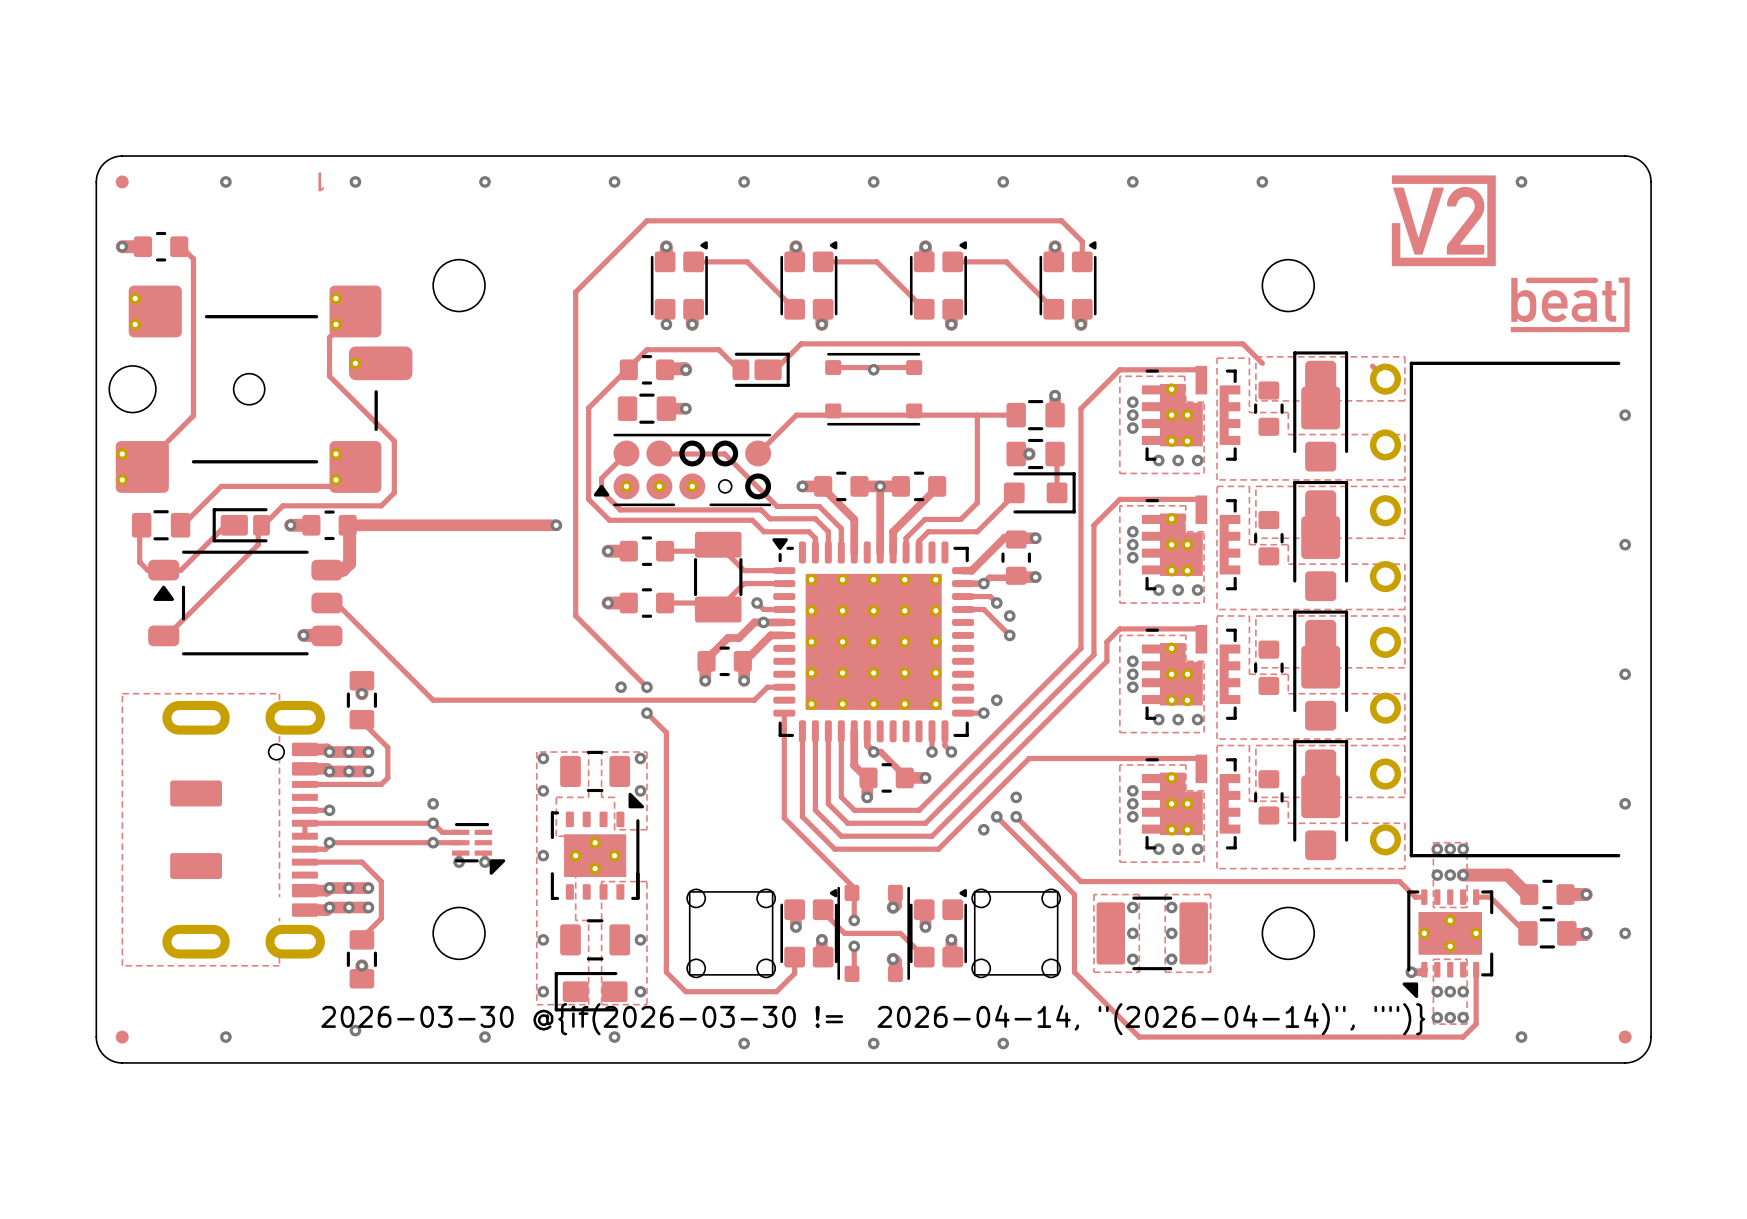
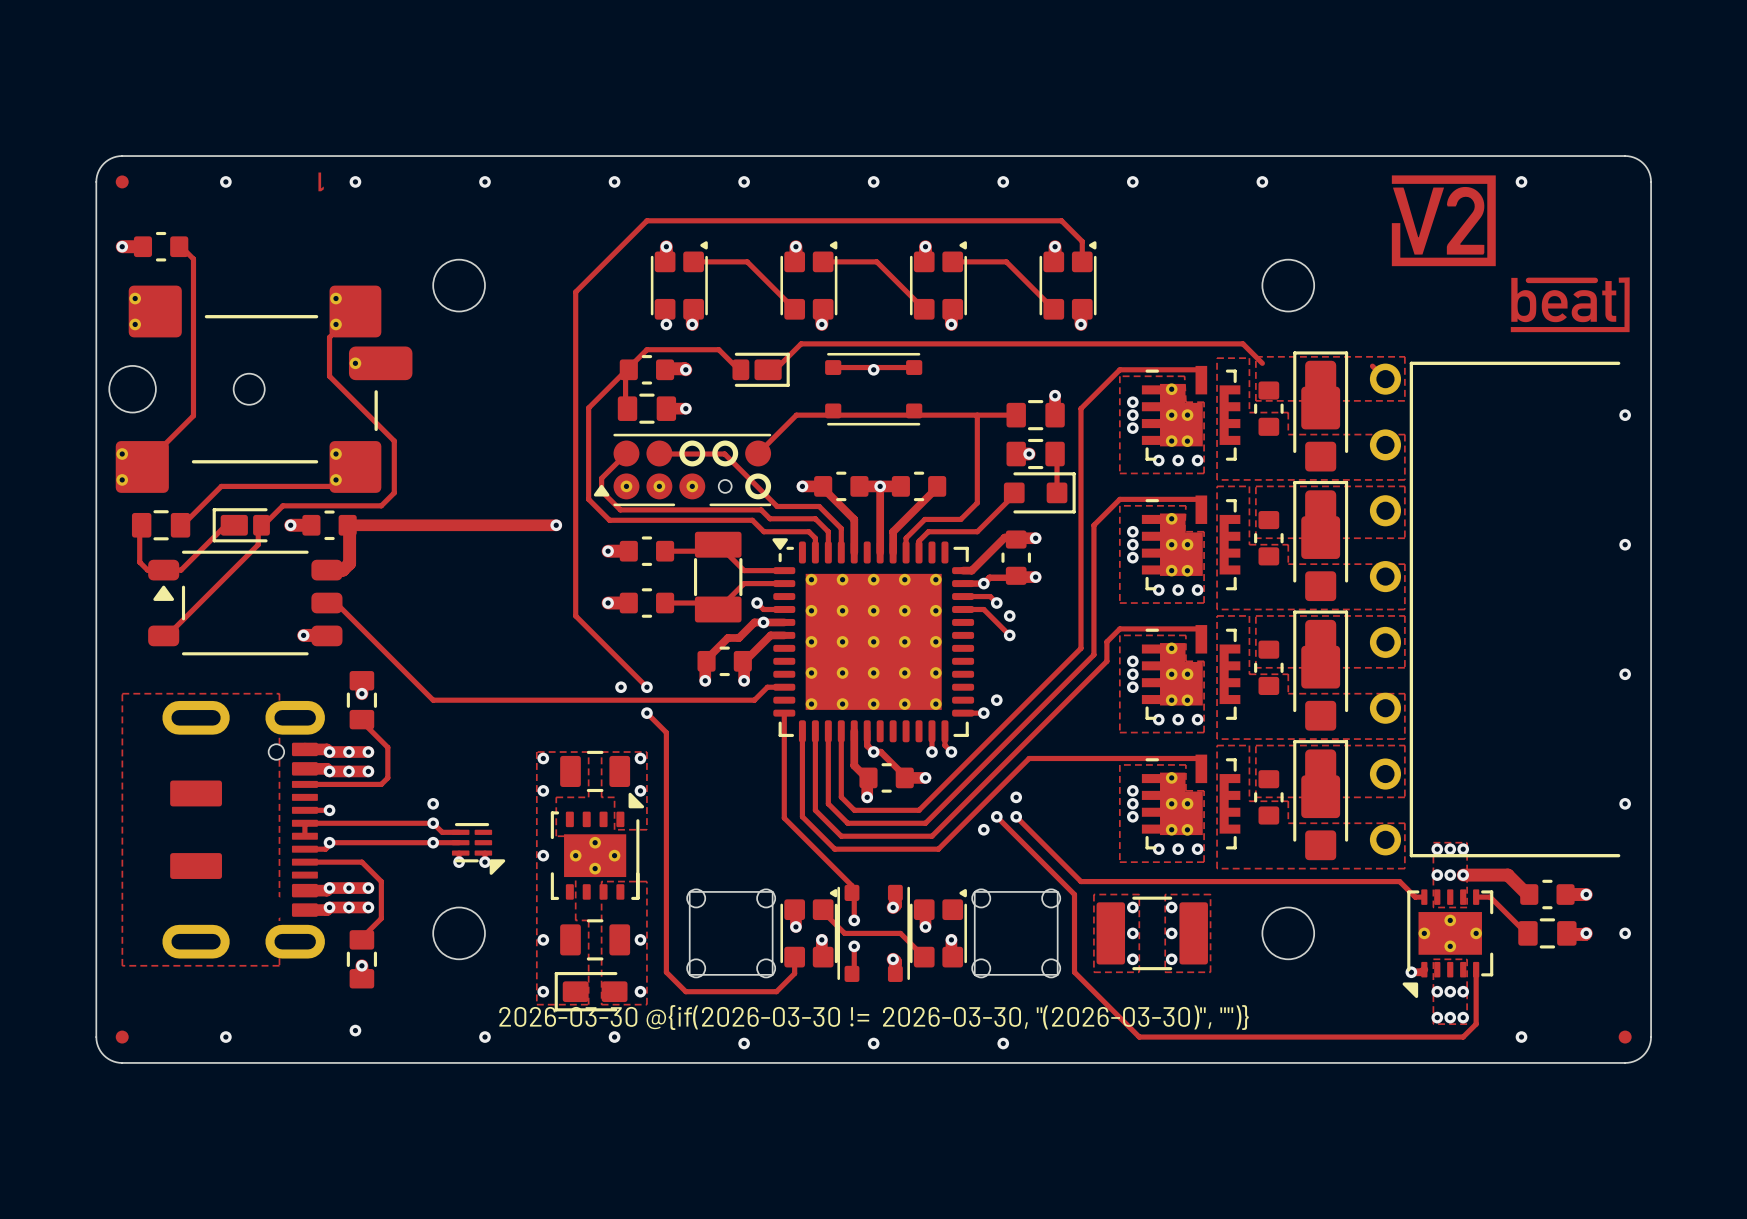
track: none -> (625, 371) (625, 407)
drawing shape: [321, 1003, 1426, 1036] -> [499, 1005, 1249, 1030]

